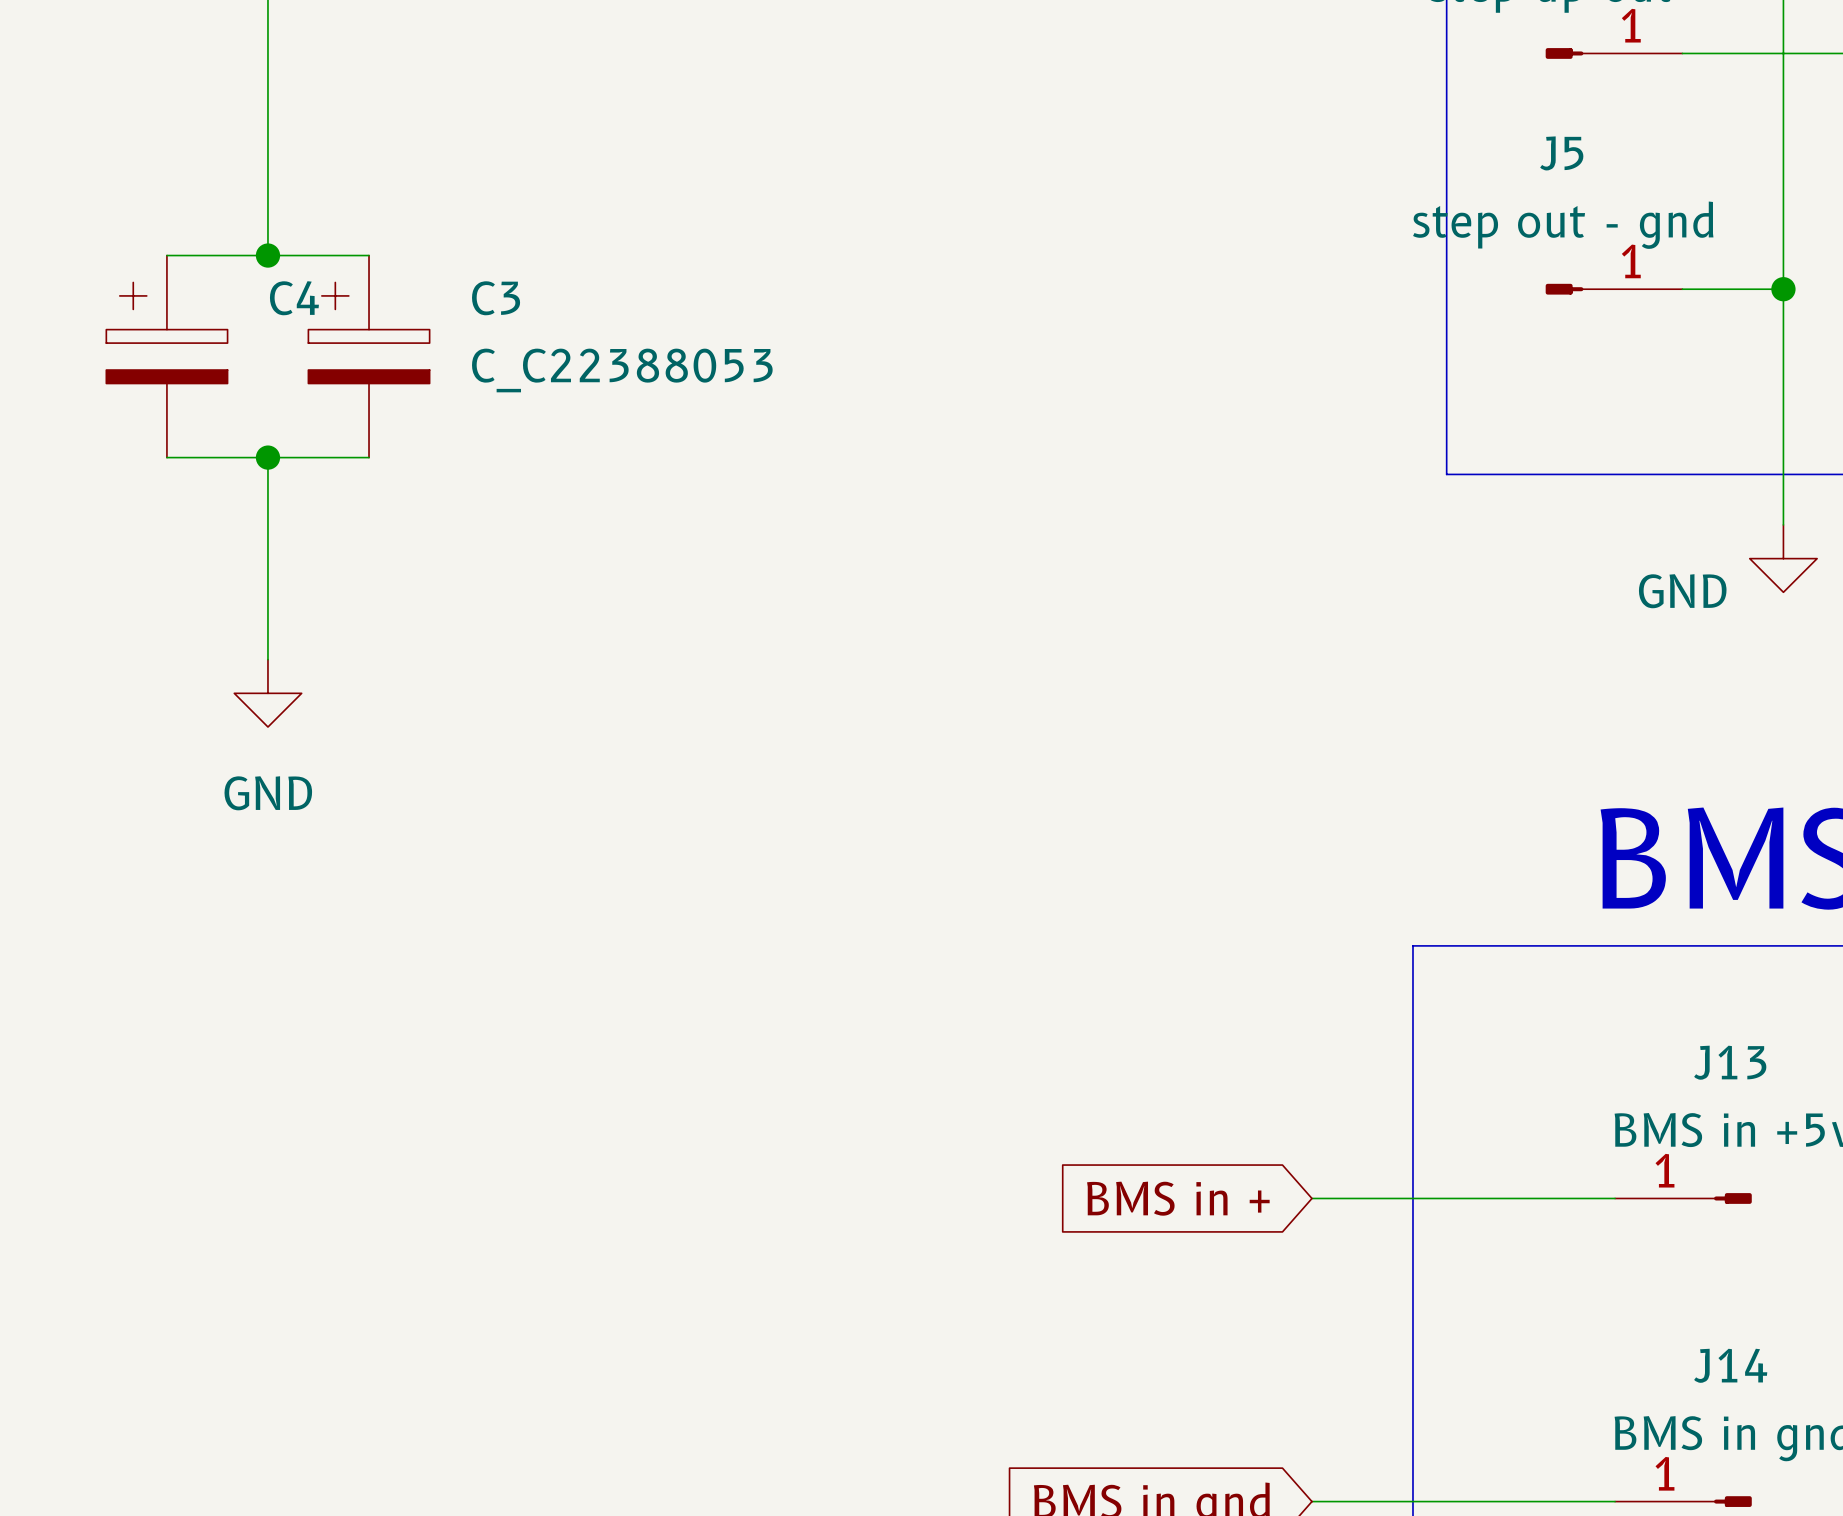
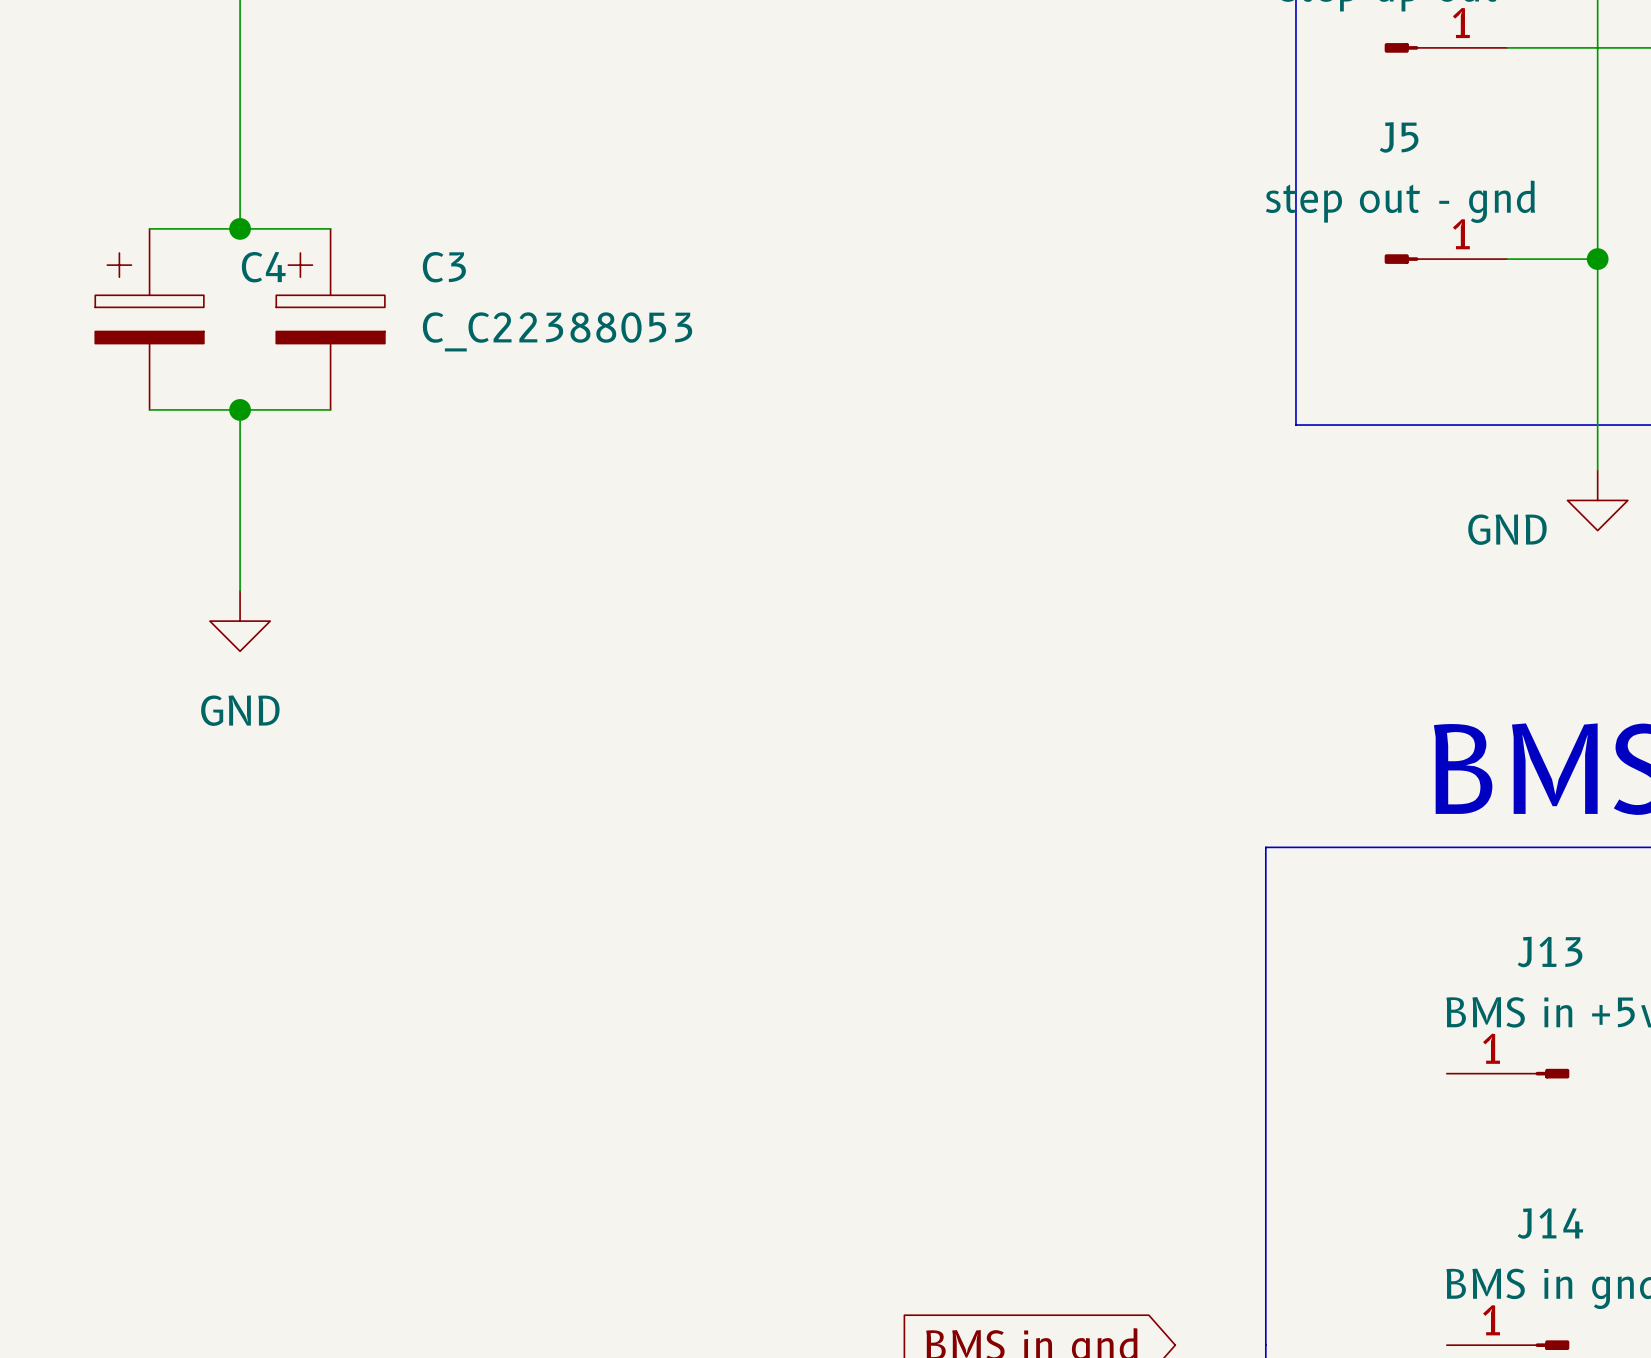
global label: BMS in + (1178, 1198) -> none
wire: (1311, 1198) (1615, 1198) -> none
wire: (1311, 1501) (1615, 1501) -> none

